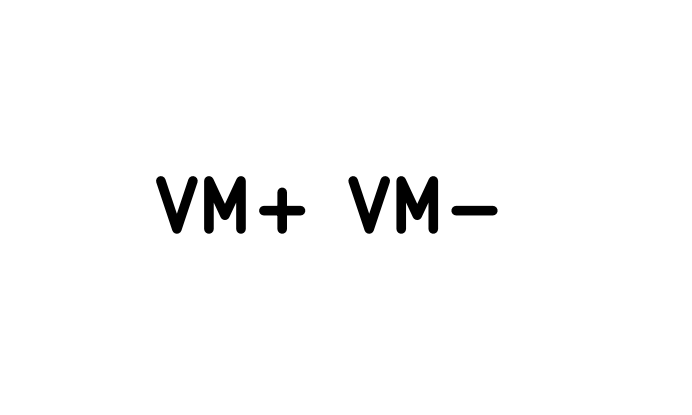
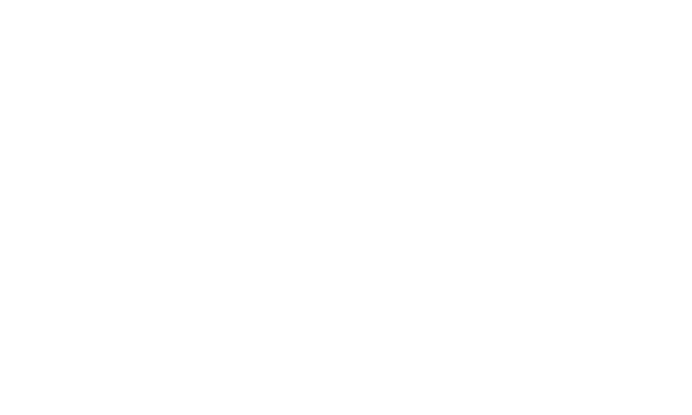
text: VM+ VM- (326, 204) -> none

